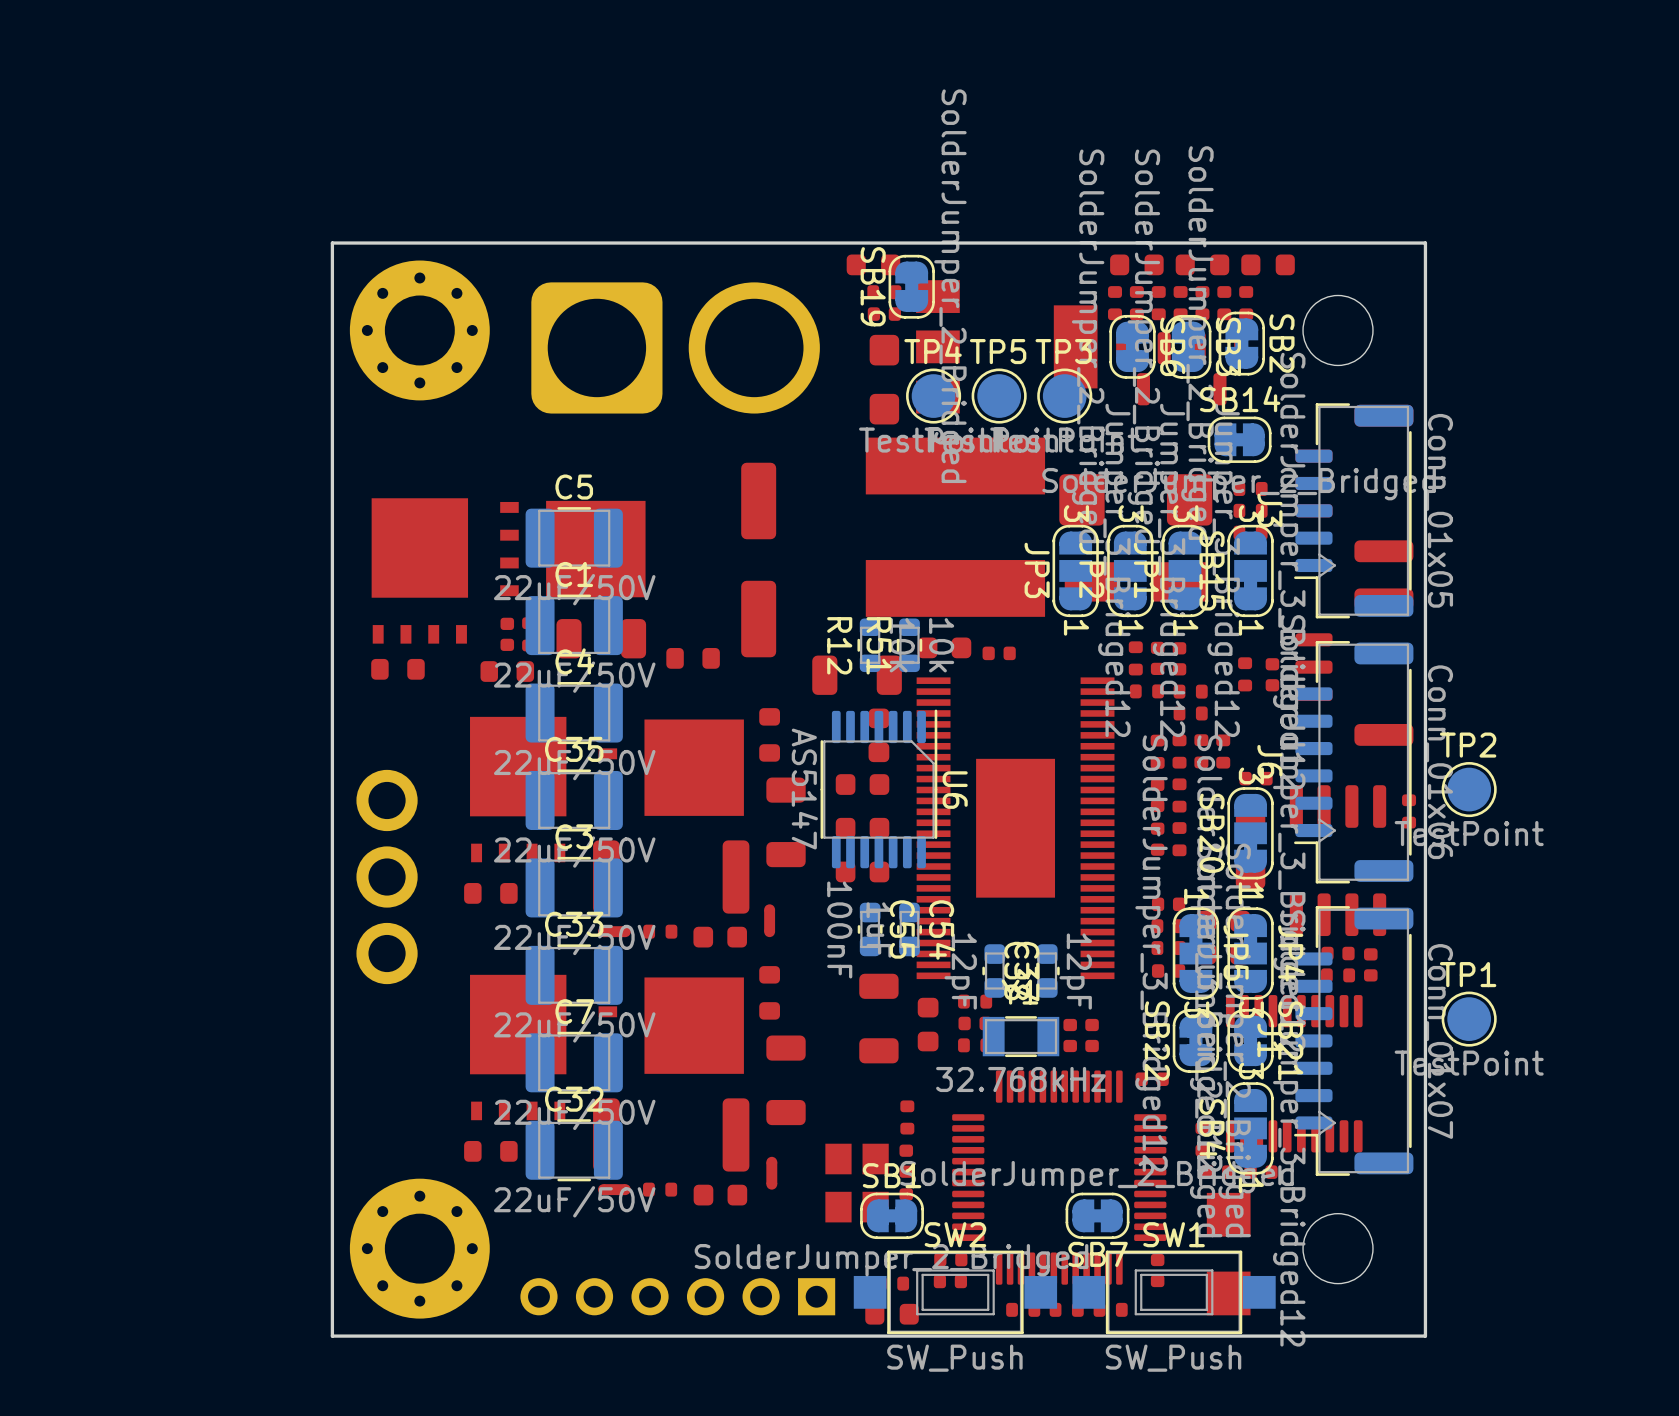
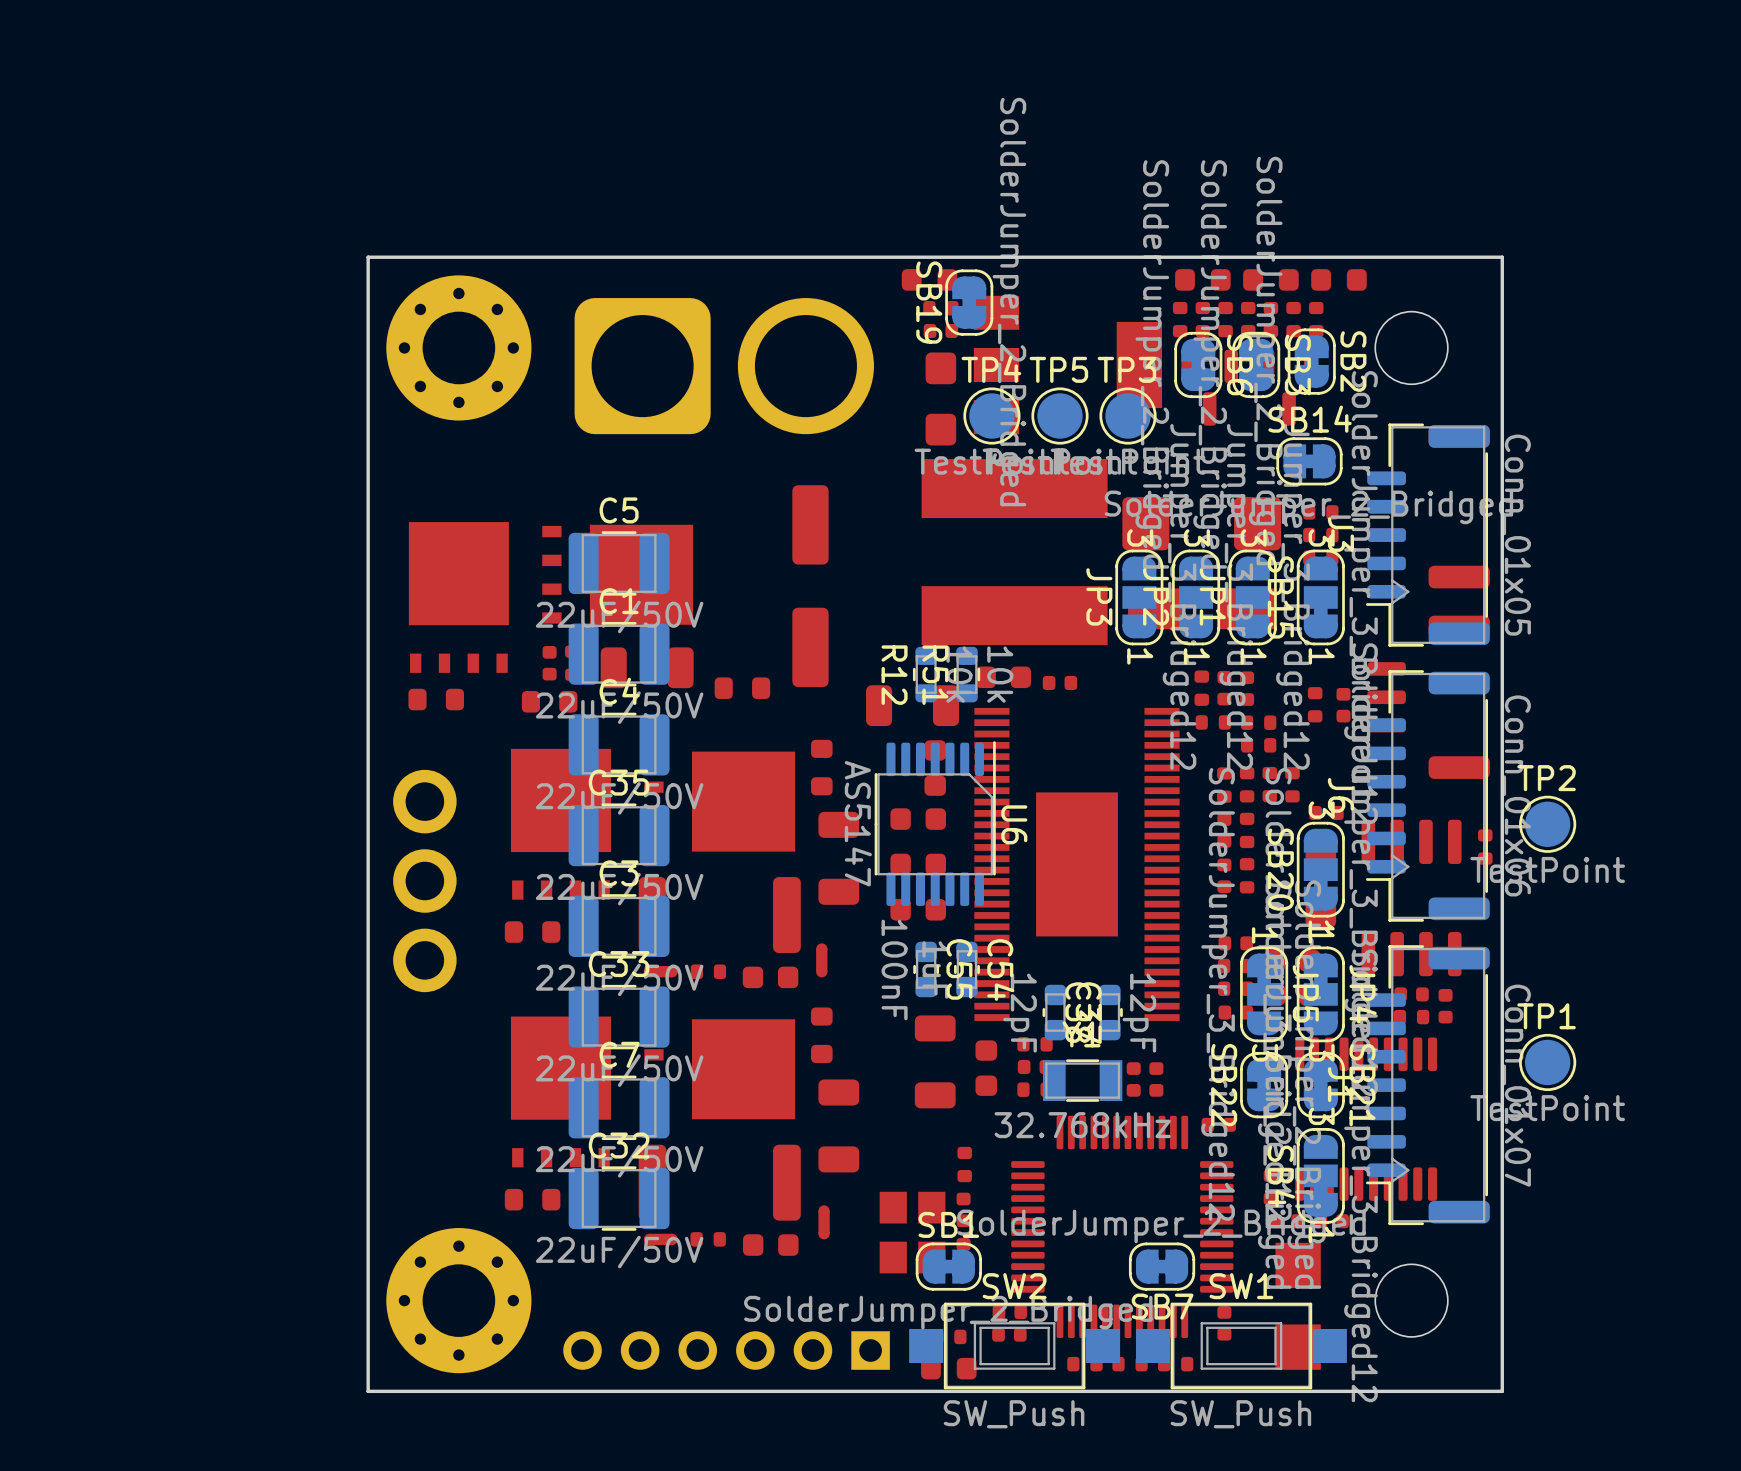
part position: (387, 877) -> (424, 881)

